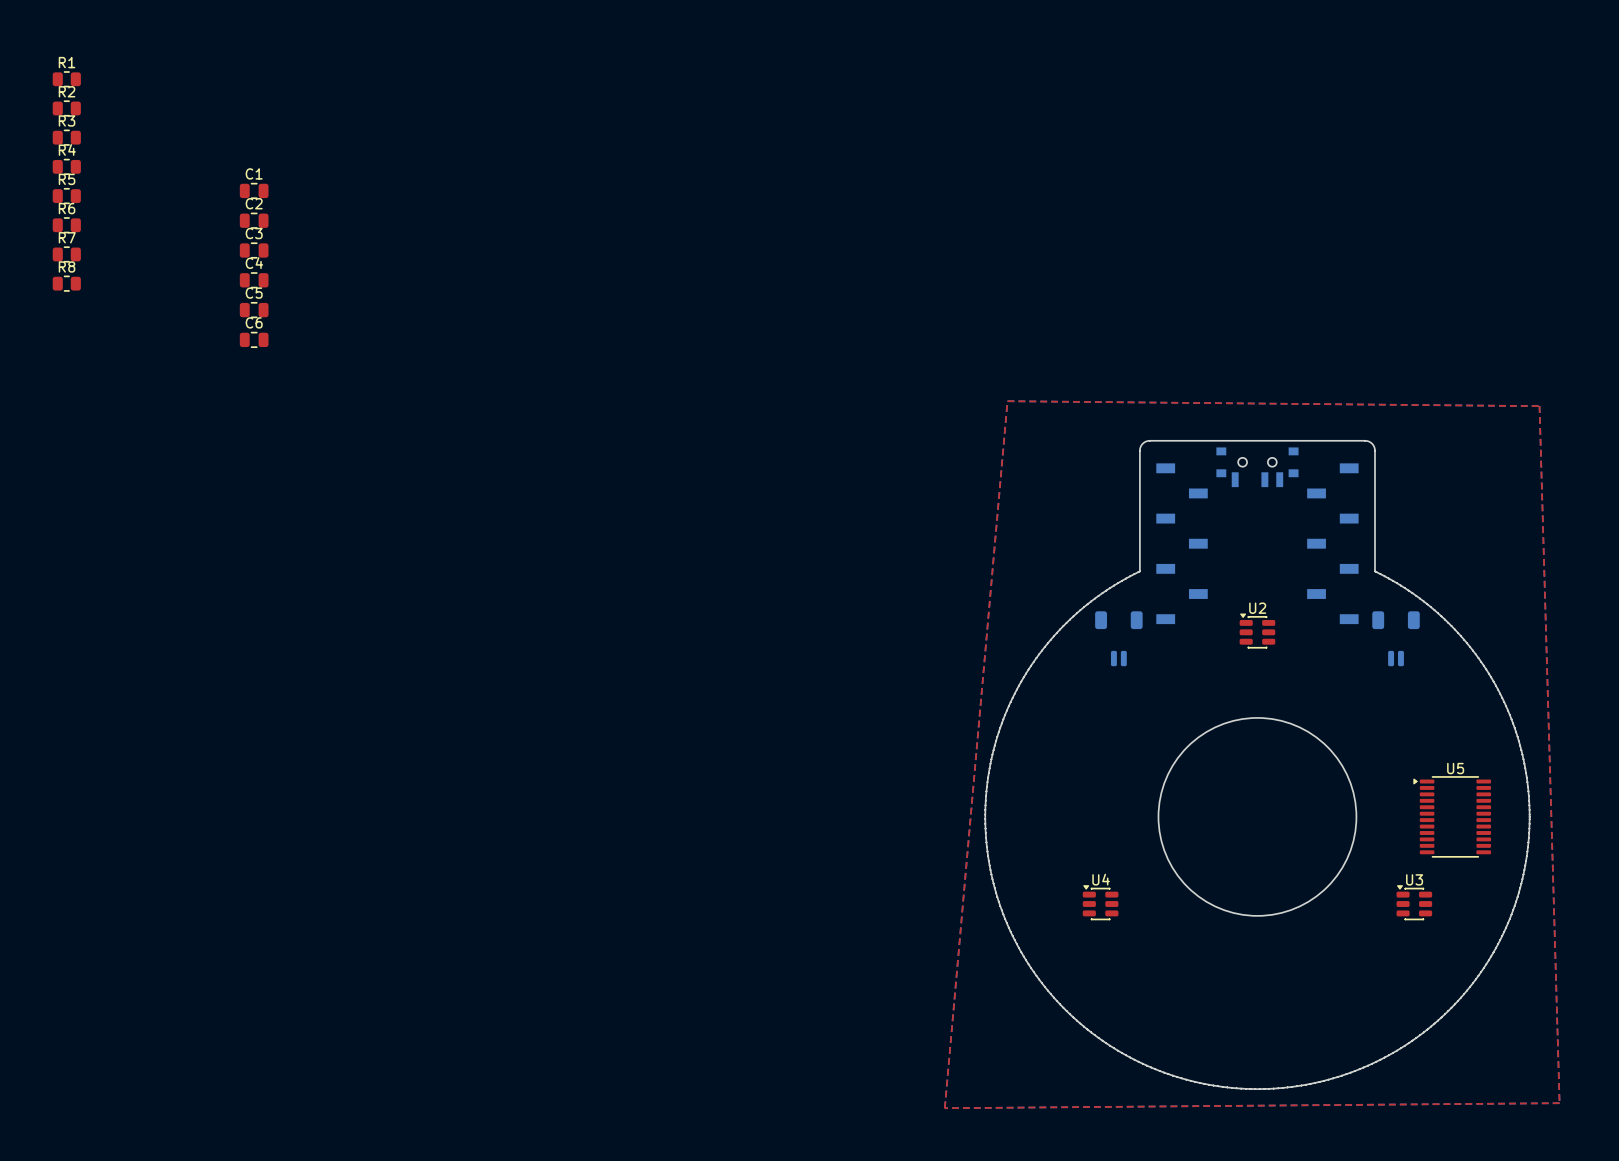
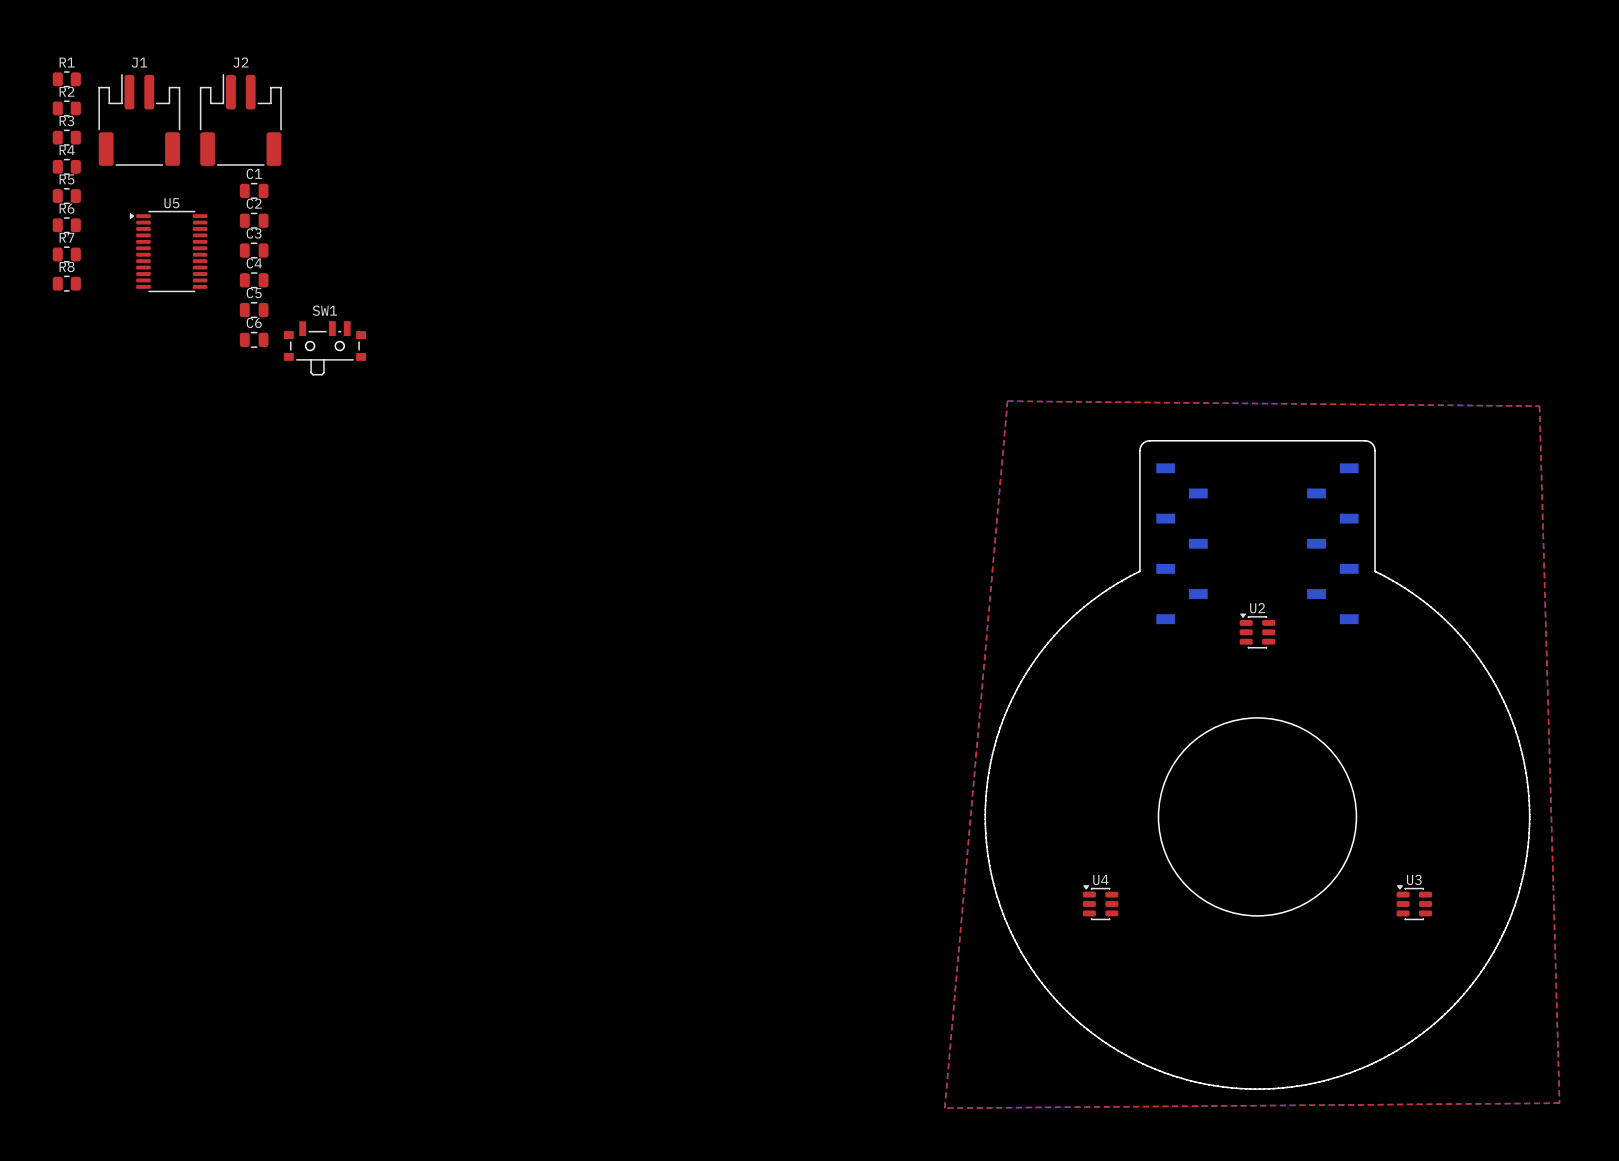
J1: none -> (139, 120)
J2: none -> (240, 120)
SW1: none -> (324, 348)
part: (1257, 467) -> none
part: (1118, 638) -> none
part: (1396, 638) -> none
U5 position: (1452, 816) -> (168, 251)

